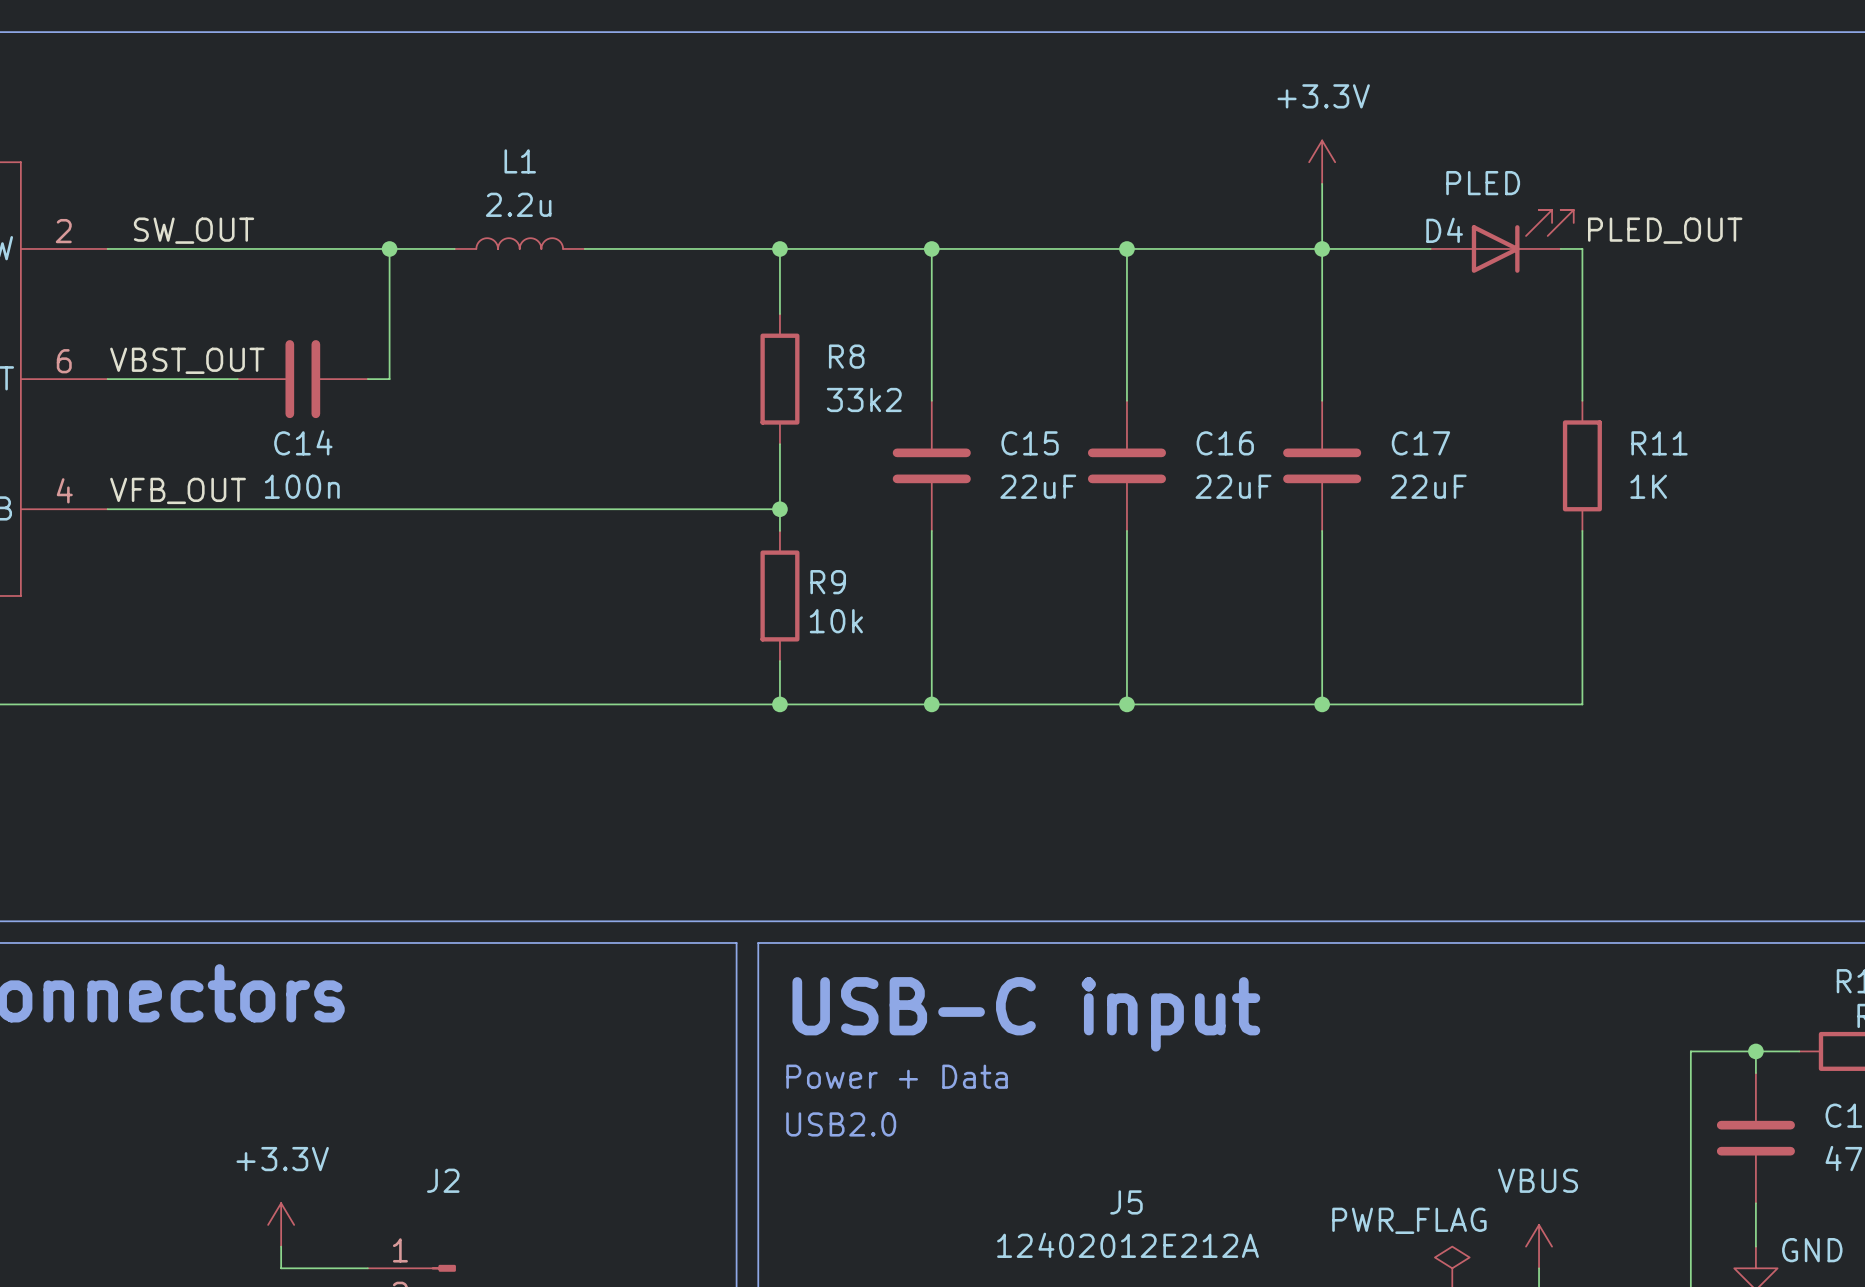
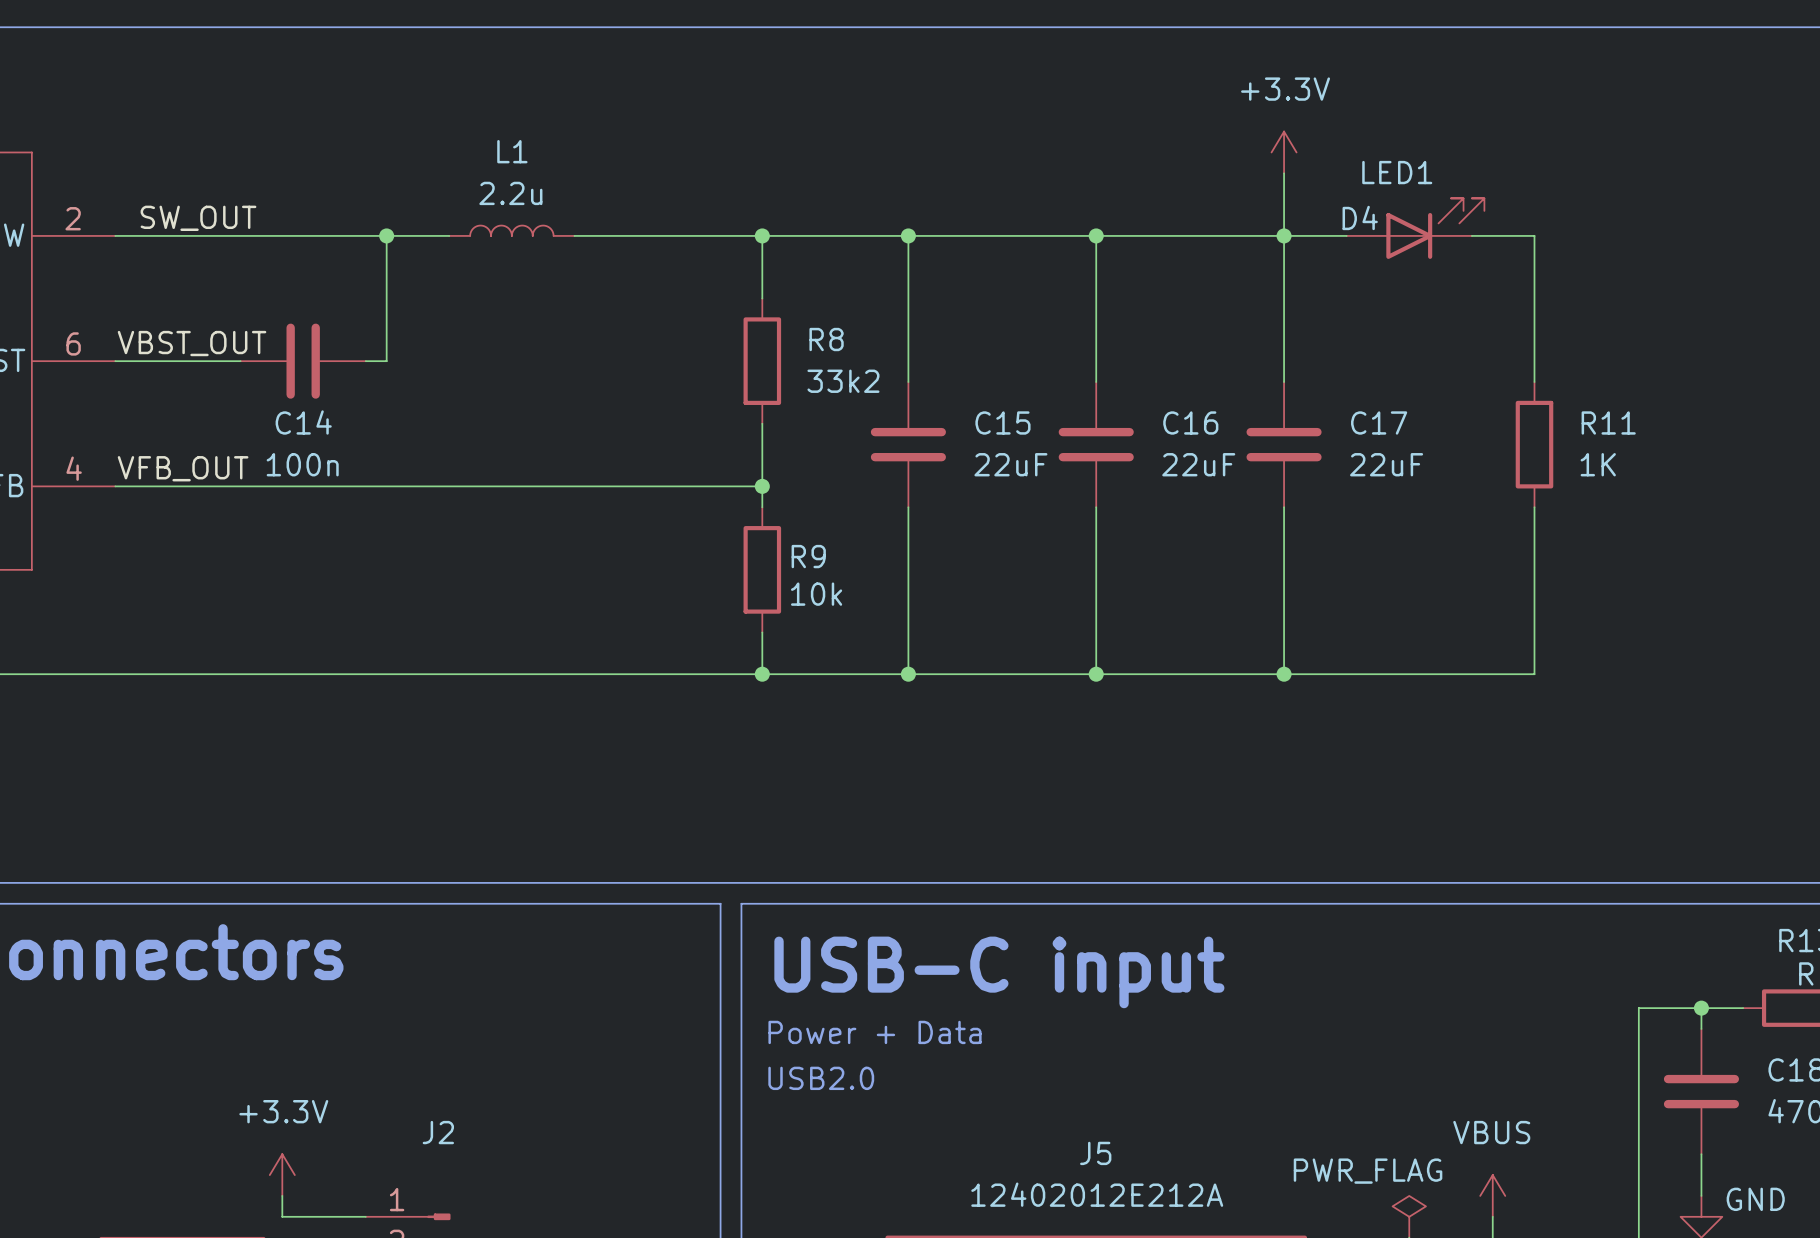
D4 value: PLED (1483, 183) -> LED1 (1397, 172)
label: PLED_OUT (1665, 230) -> none
D4 position: (1502, 241) -> (1415, 228)

